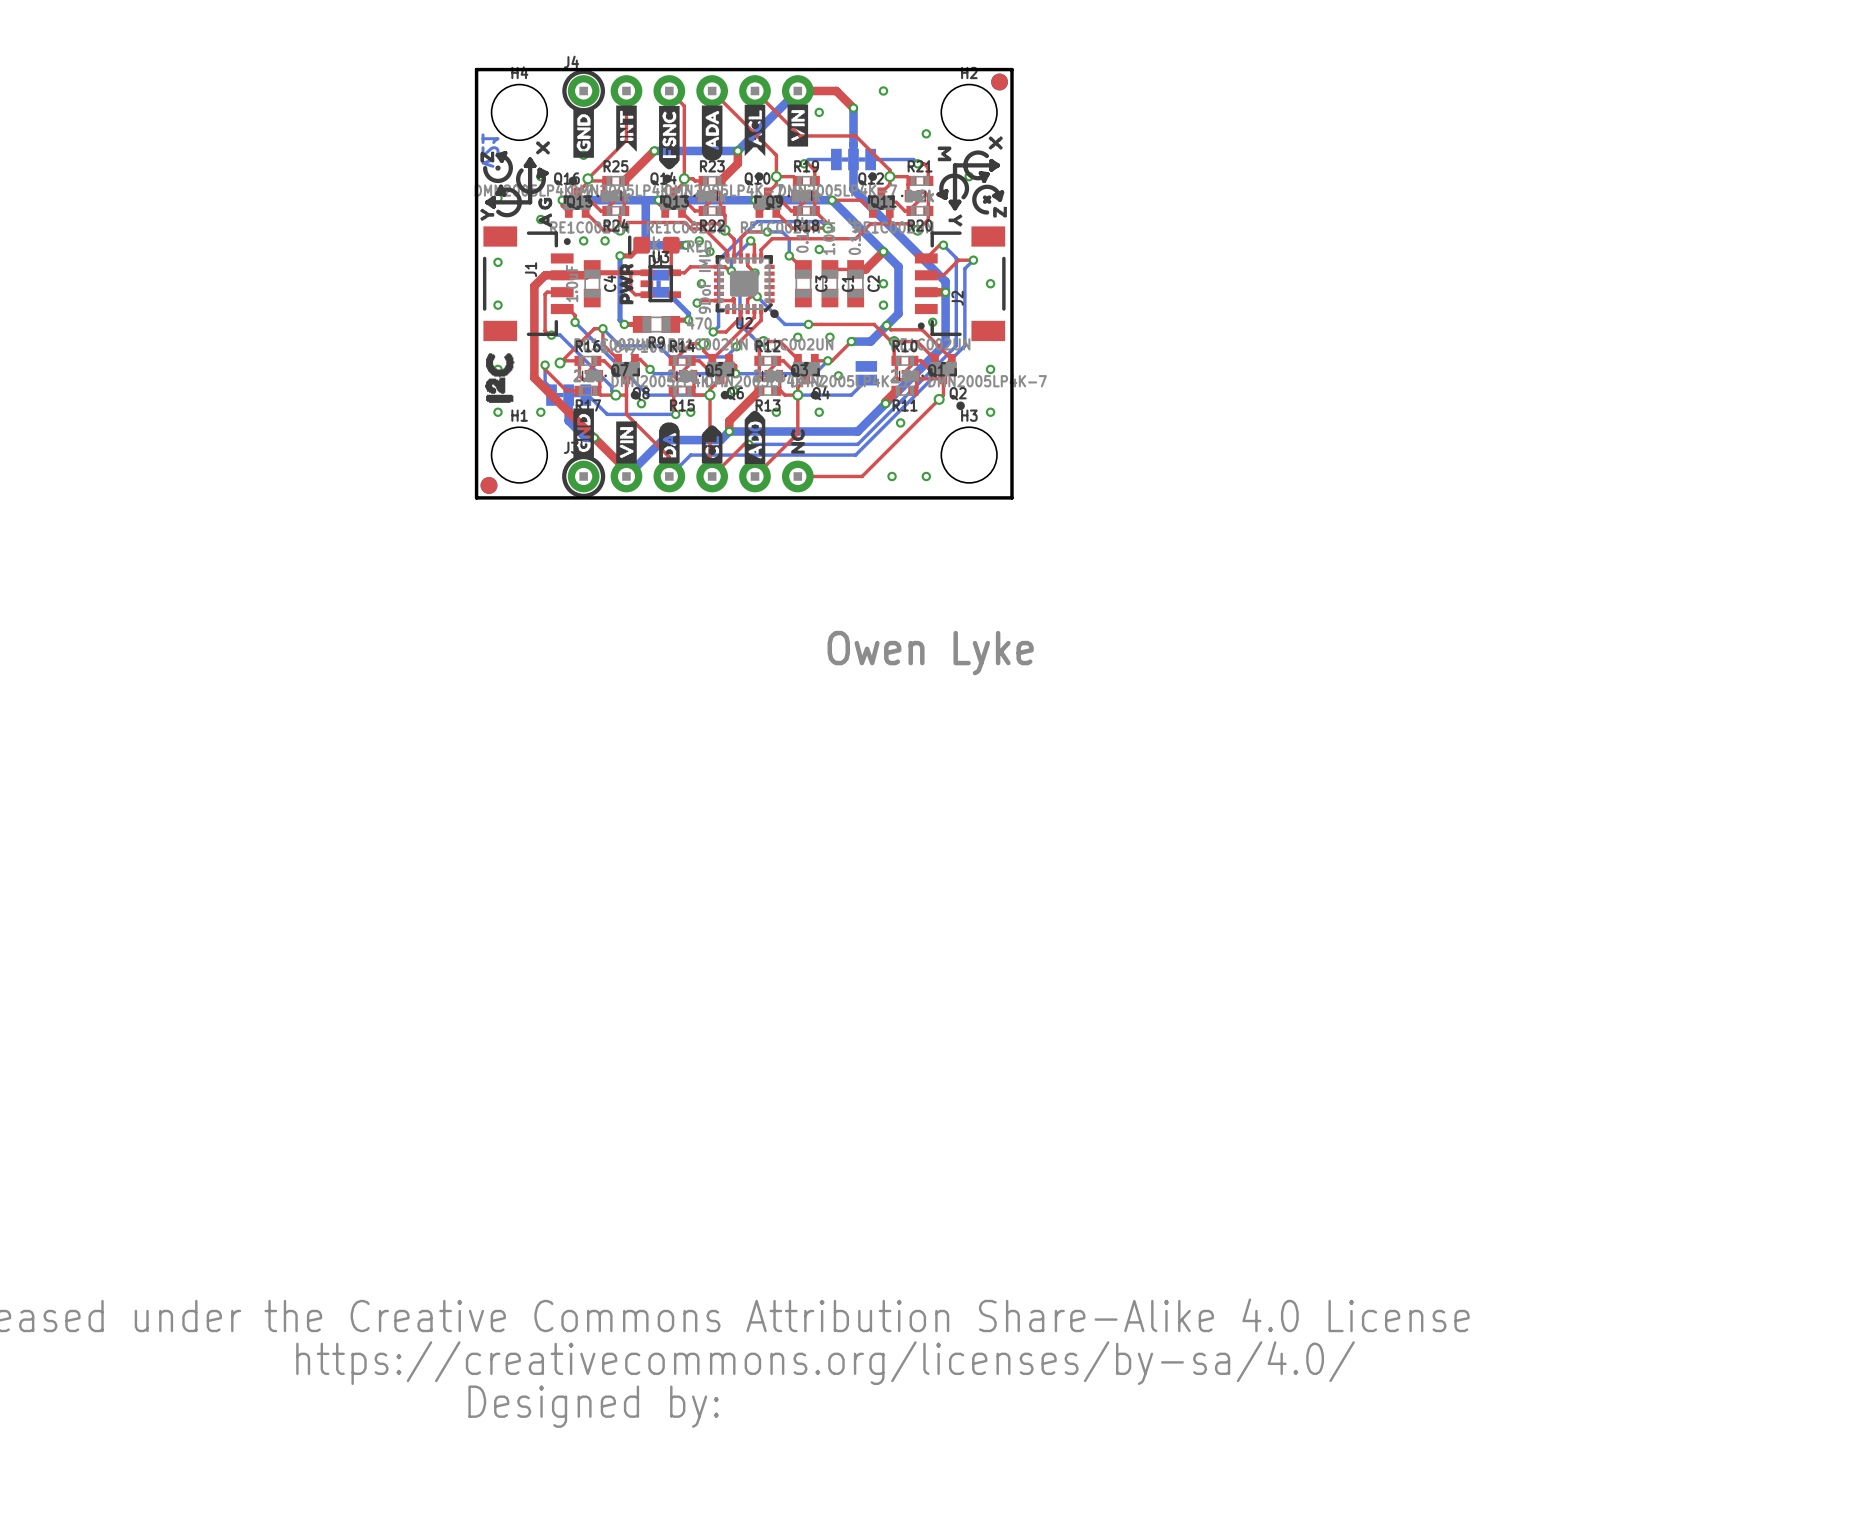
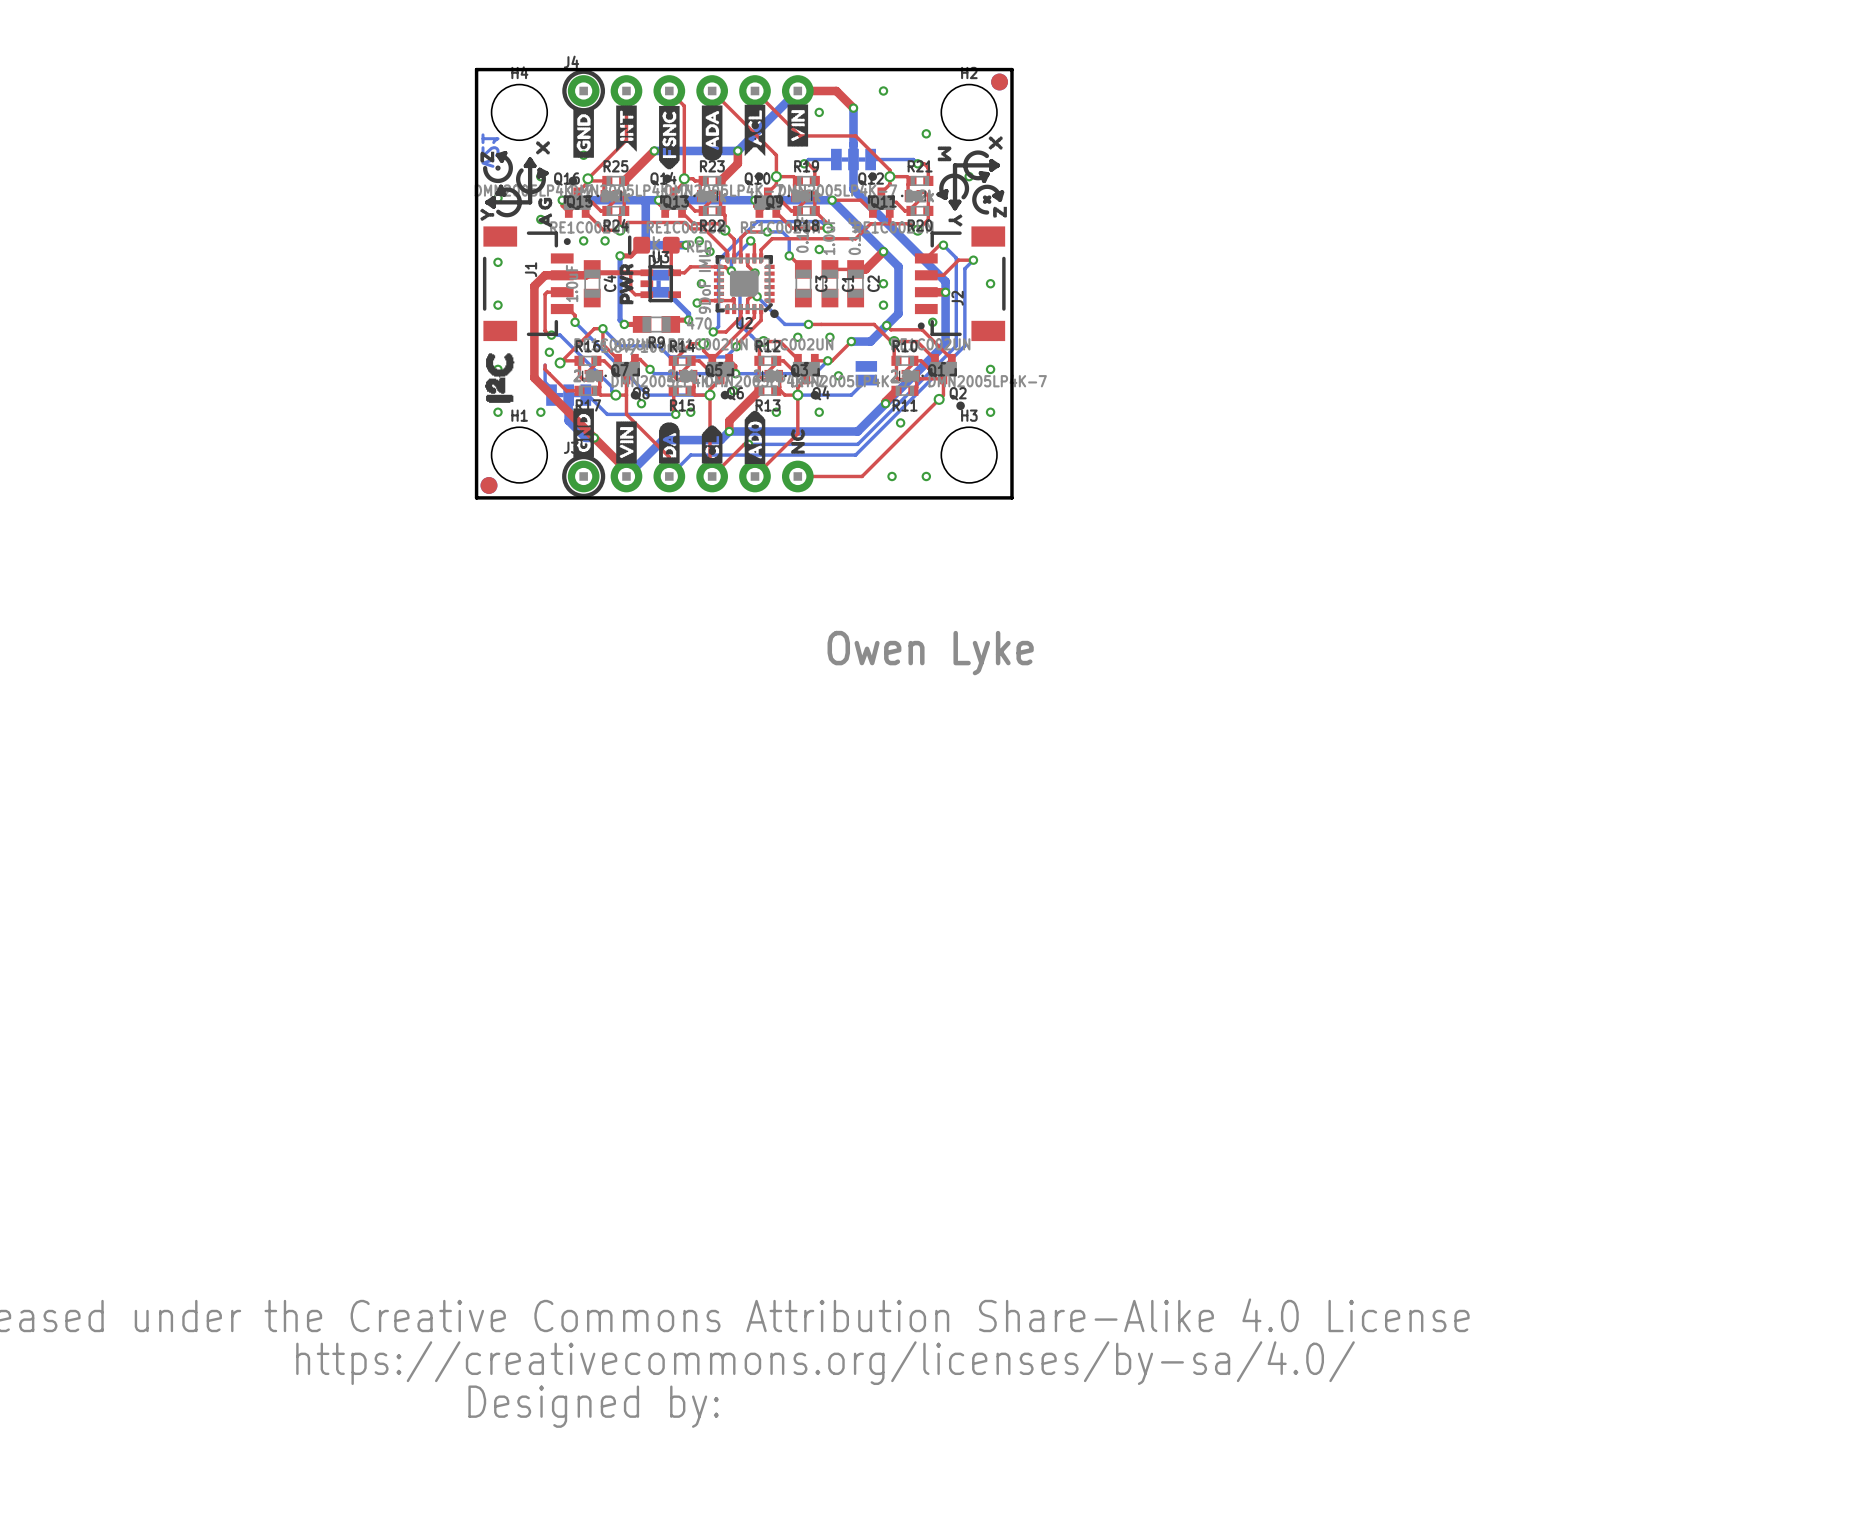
via position: (545, 365) -> (549, 352)

